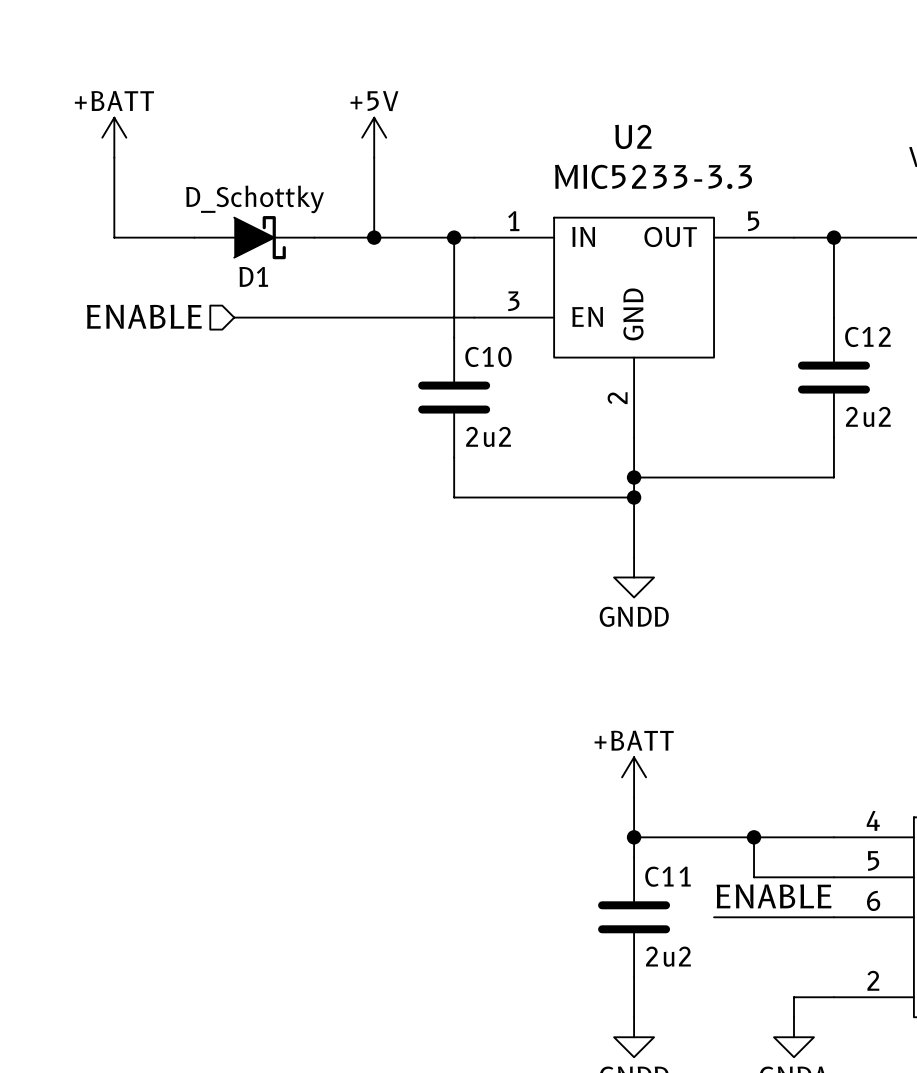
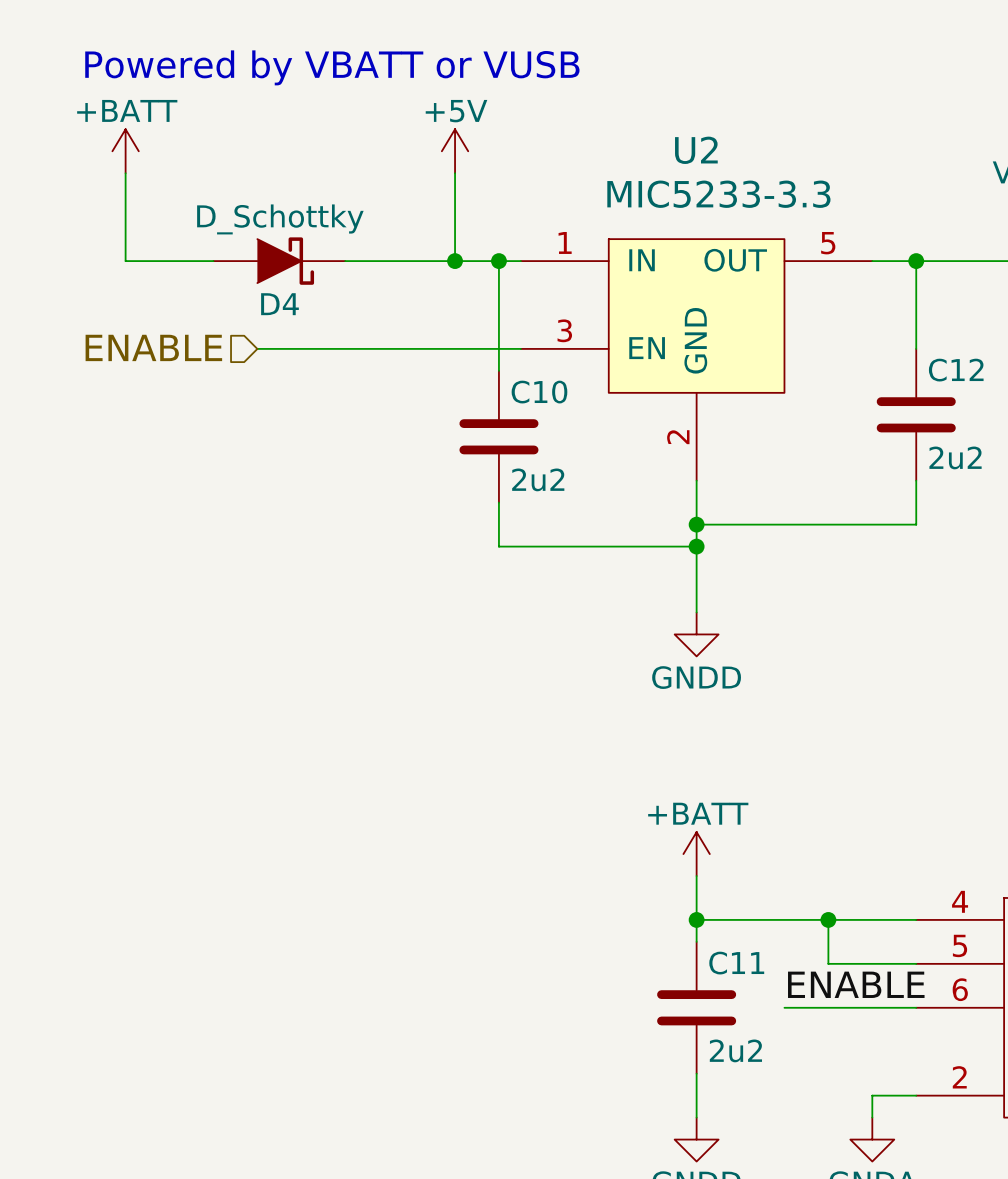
text: none -> Powered by VBATT or VUSB (332, 67)
power symbol position: +5V (374, 137) -> +5V (455, 151)
wire: (374, 157) (374, 237) -> (455, 173) (455, 261)
junction position: (374, 237) -> (455, 261)
D1 name: D1 (253, 276) -> D4 (279, 304)

